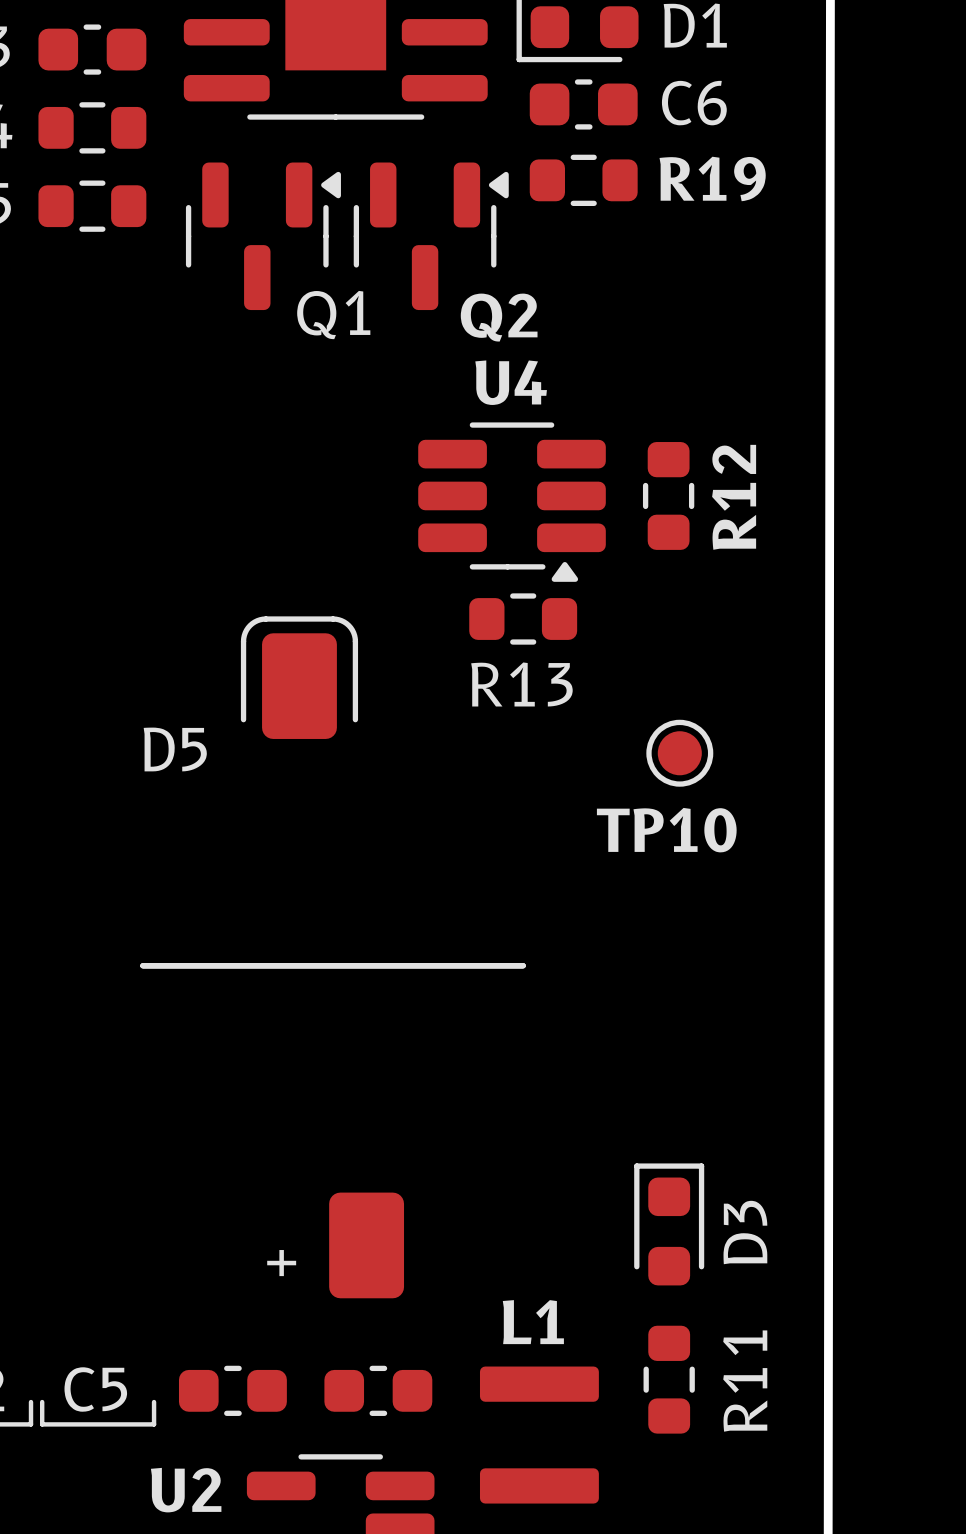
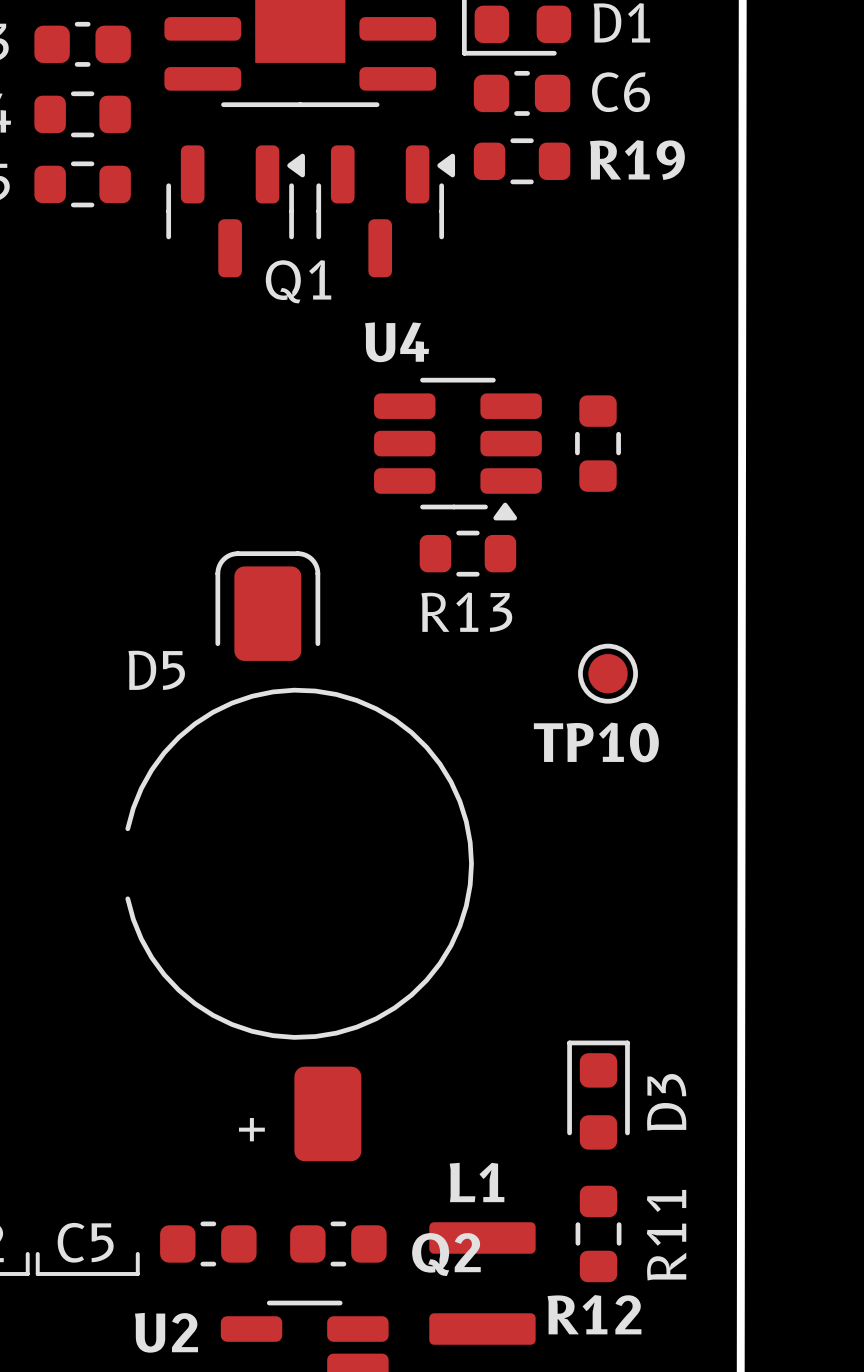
Q2 name position: Q2 (499, 317) -> Q2 (446, 1254)
U4 name position: U4 (511, 382) -> U4 (397, 342)
R12 name rotation: 0° (734, 497) -> 90° clockwise (594, 1314)
R12 name position: R12 (734, 497) -> R12 (594, 1314)
D5 footprint: [140, 616, 526, 1299] -> [125, 551, 474, 1162]

